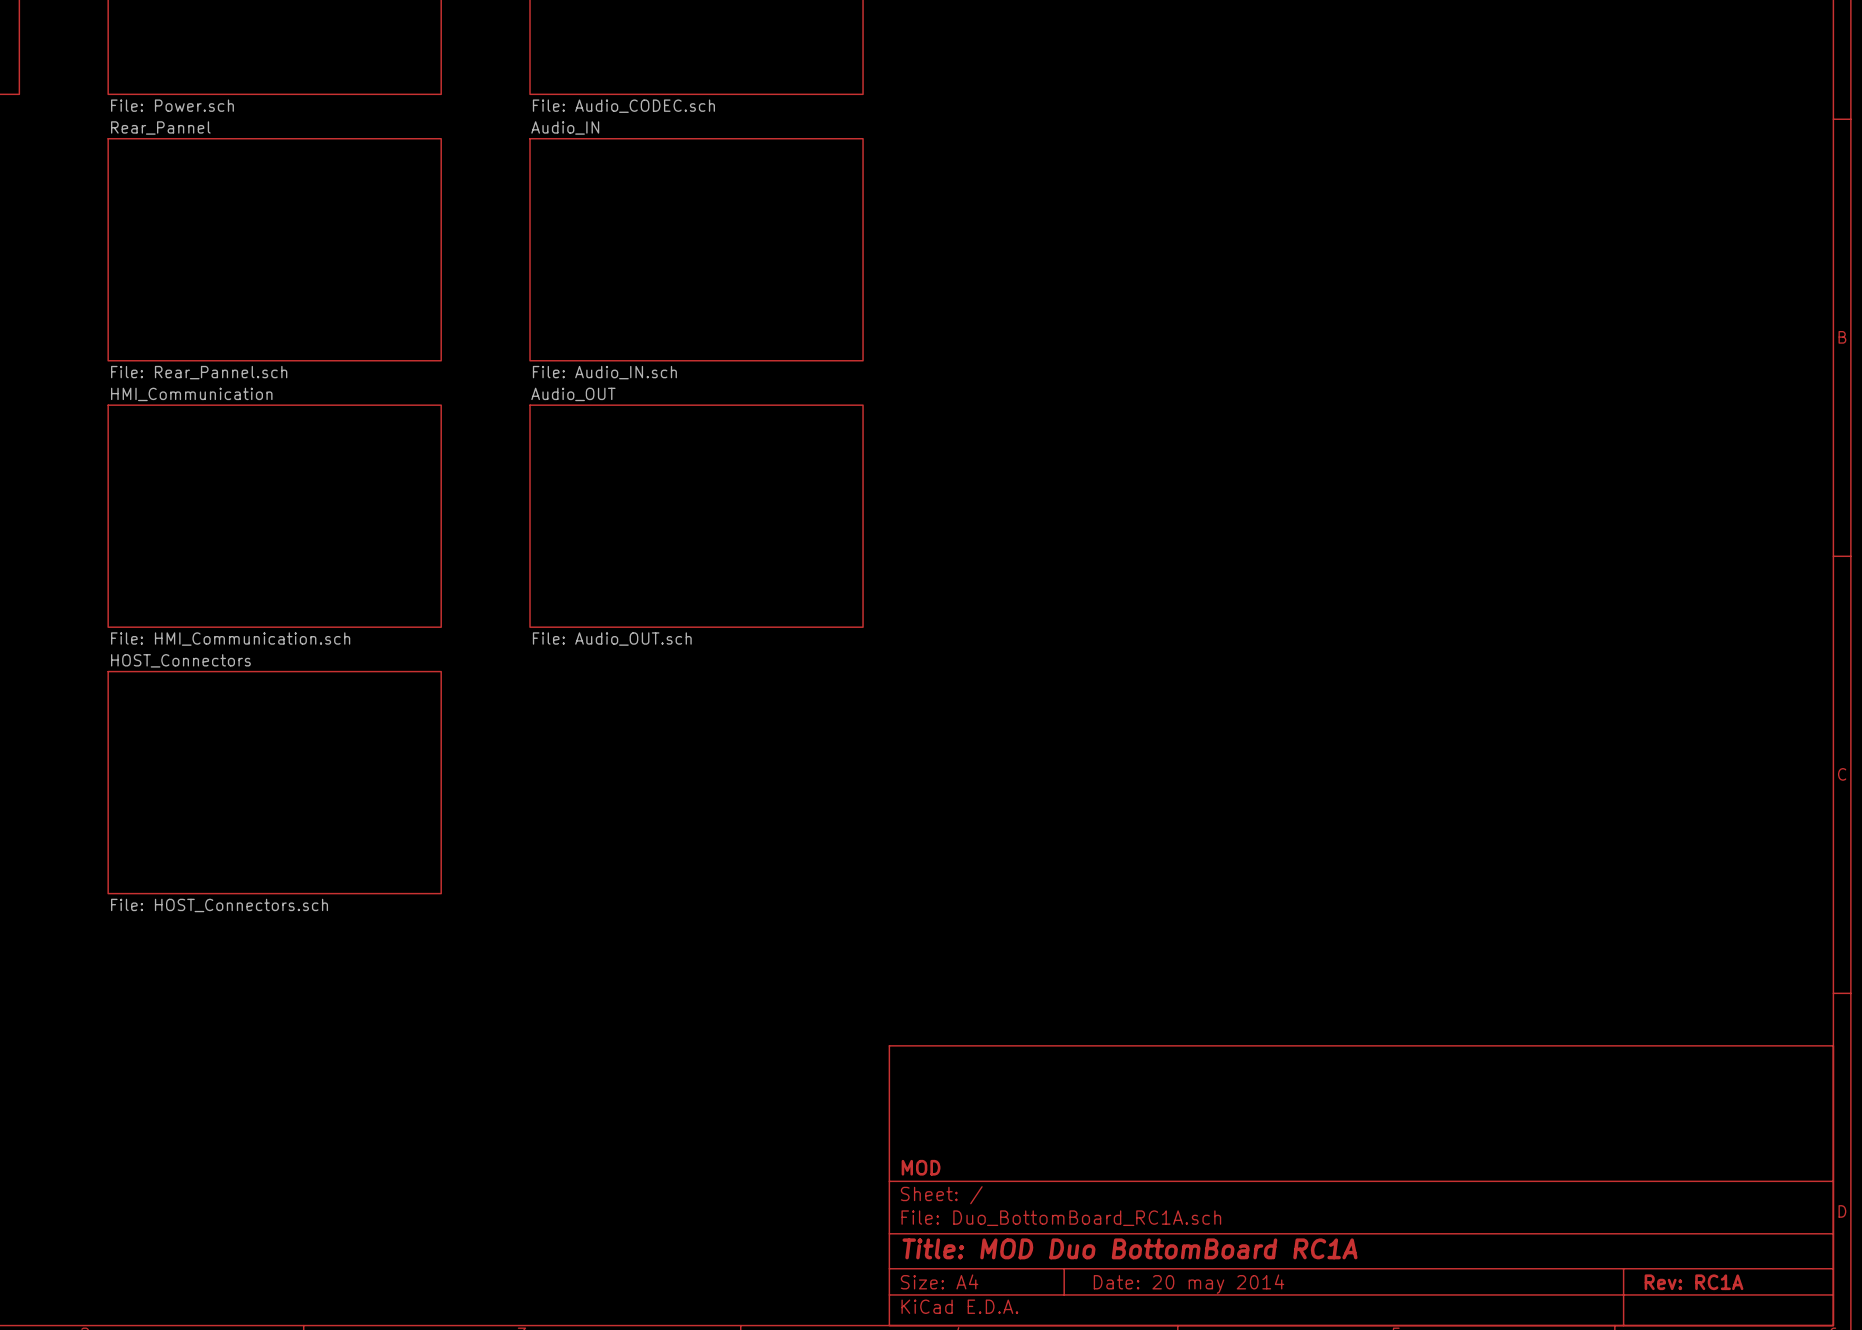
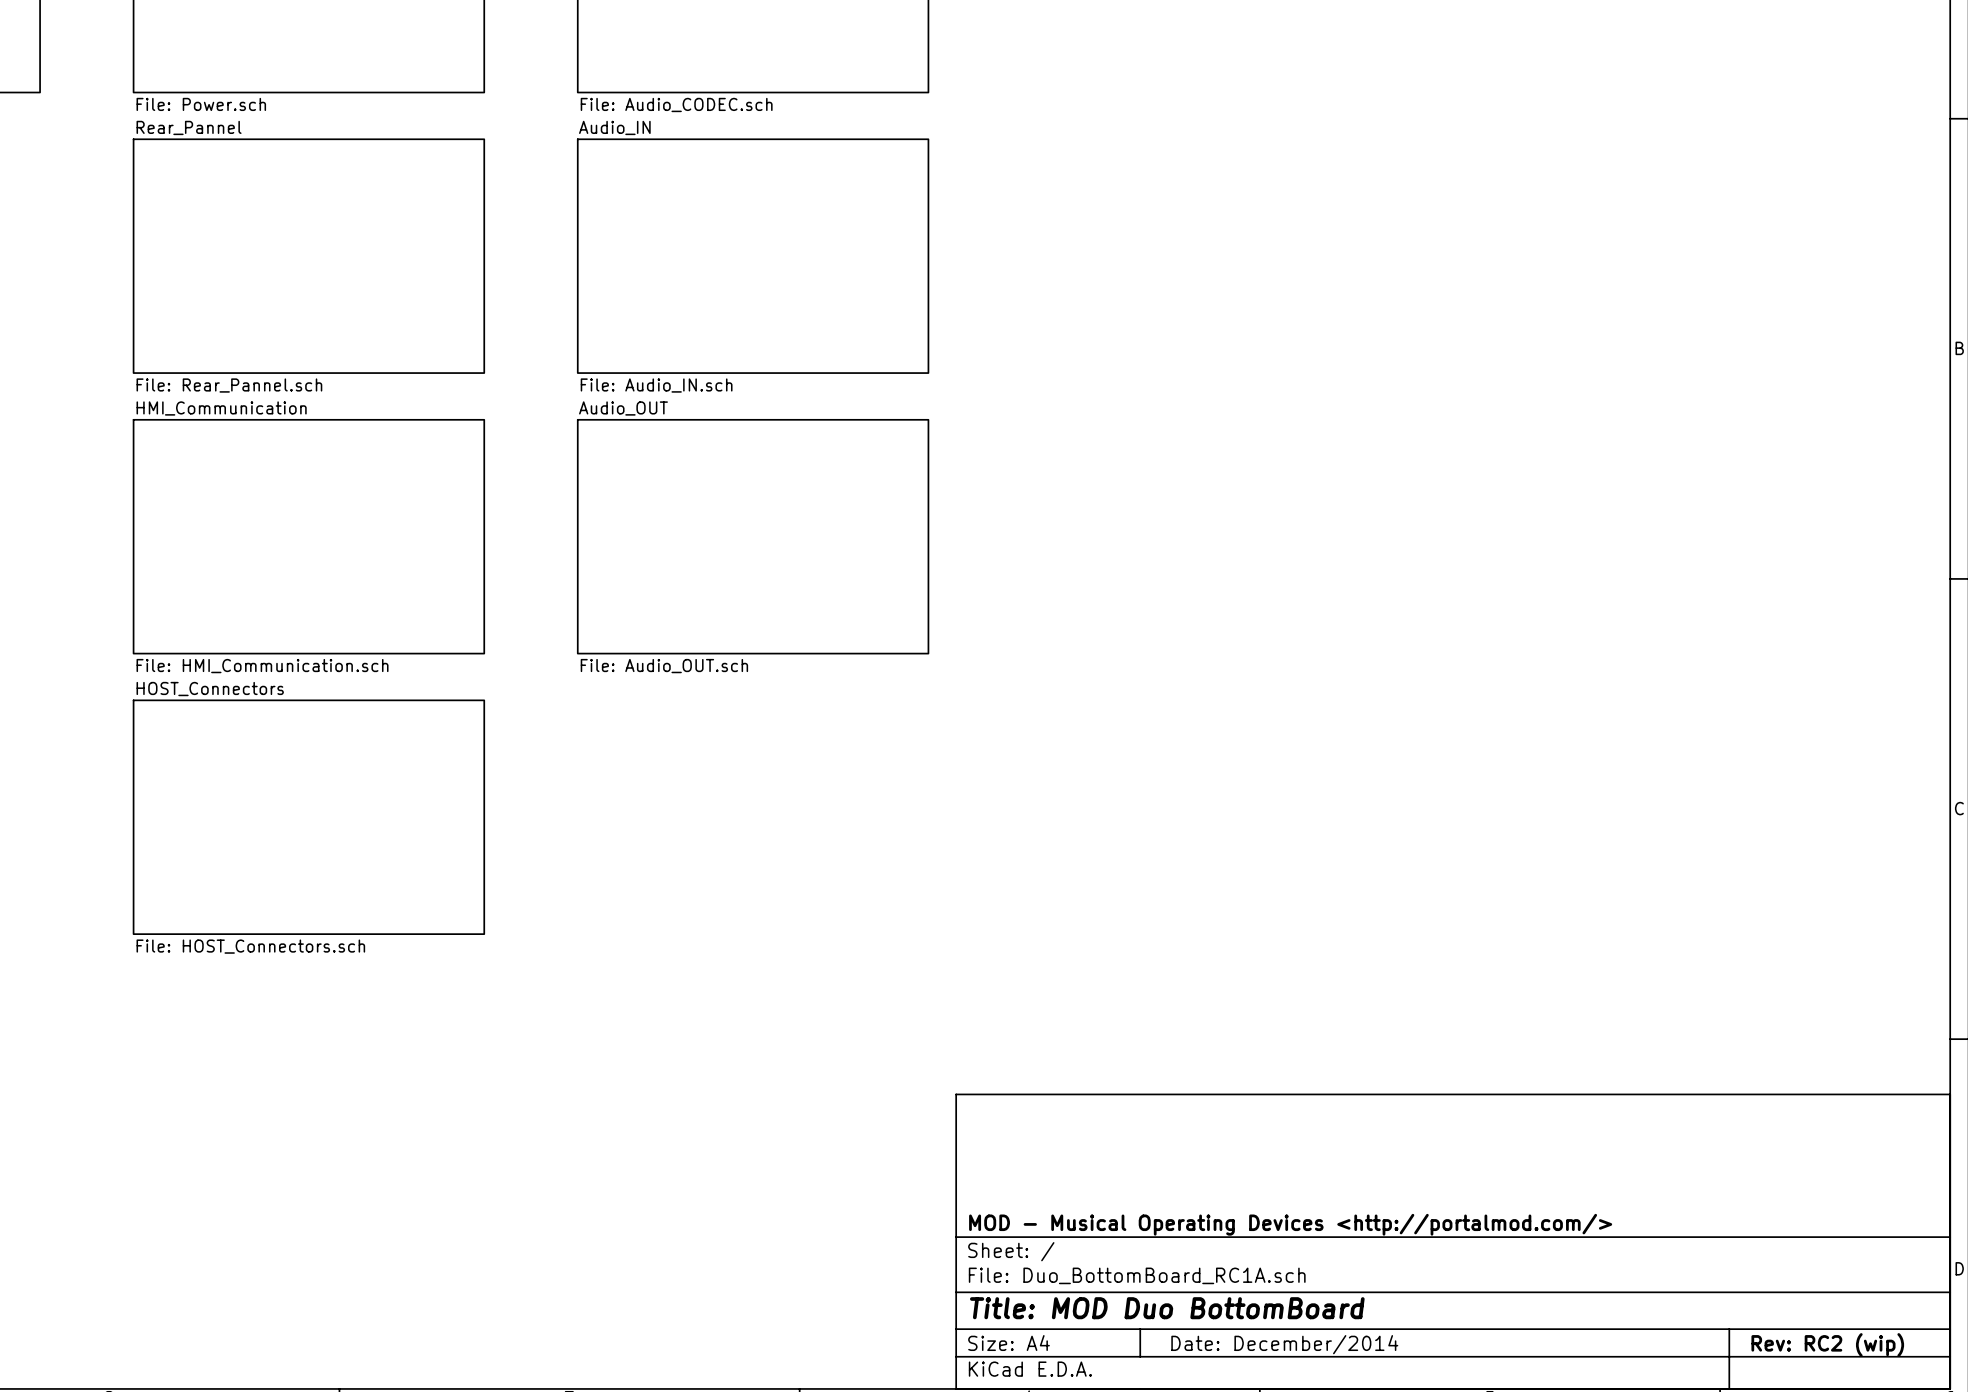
title block: MOD (921, 1167) -> MOD - Musical Operating Devices <http://portalmod.com/> (1290, 1224)
title block: Title: MOD Duo BottomBoard RC1A (1130, 1248) -> Title: MOD Duo BottomBoard (1167, 1308)
title block: Rev: RC1A (1694, 1282) -> Rev: RC2 (wip) (1827, 1344)
title block: Date: 20 may 2014 (1188, 1284) -> Date: December/2014 (1284, 1344)

